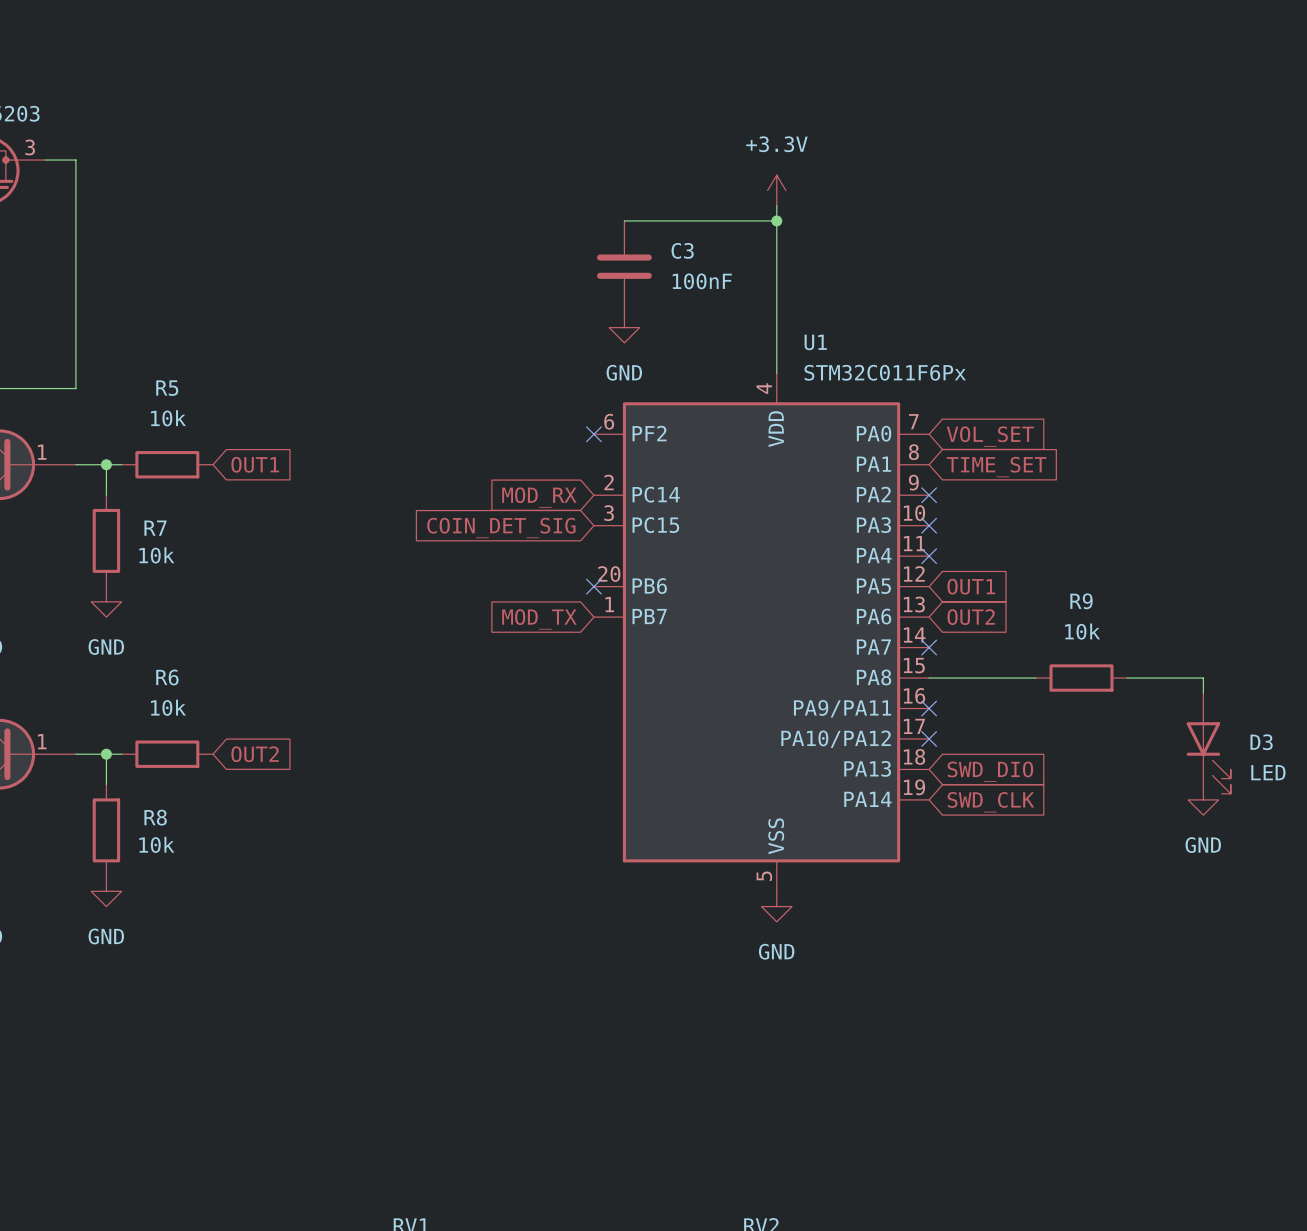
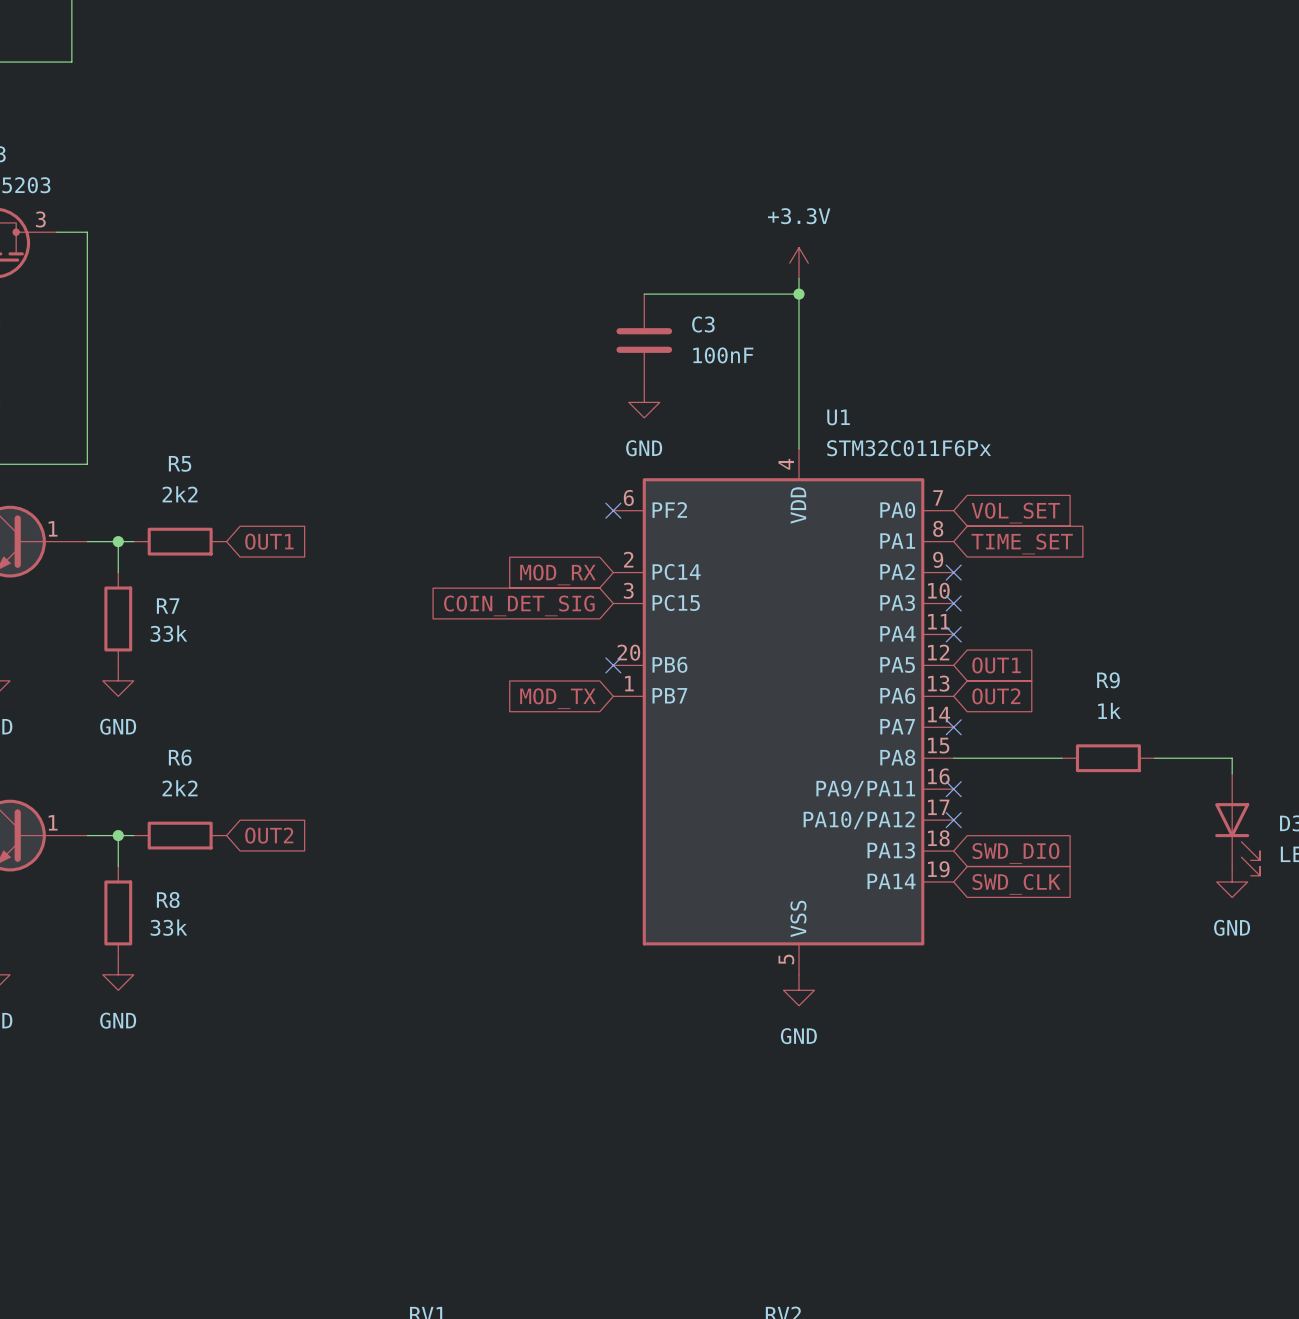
R5 value: 10k (168, 418) -> 2k2 (180, 494)
R7 value: 10k (156, 555) -> 33k (168, 633)
R9 value: 10k (1082, 631) -> 1k (1109, 710)
R6 value: 10k (168, 707) -> 2k2 (180, 788)
R8 value: 10k (156, 844) -> 33k (168, 927)

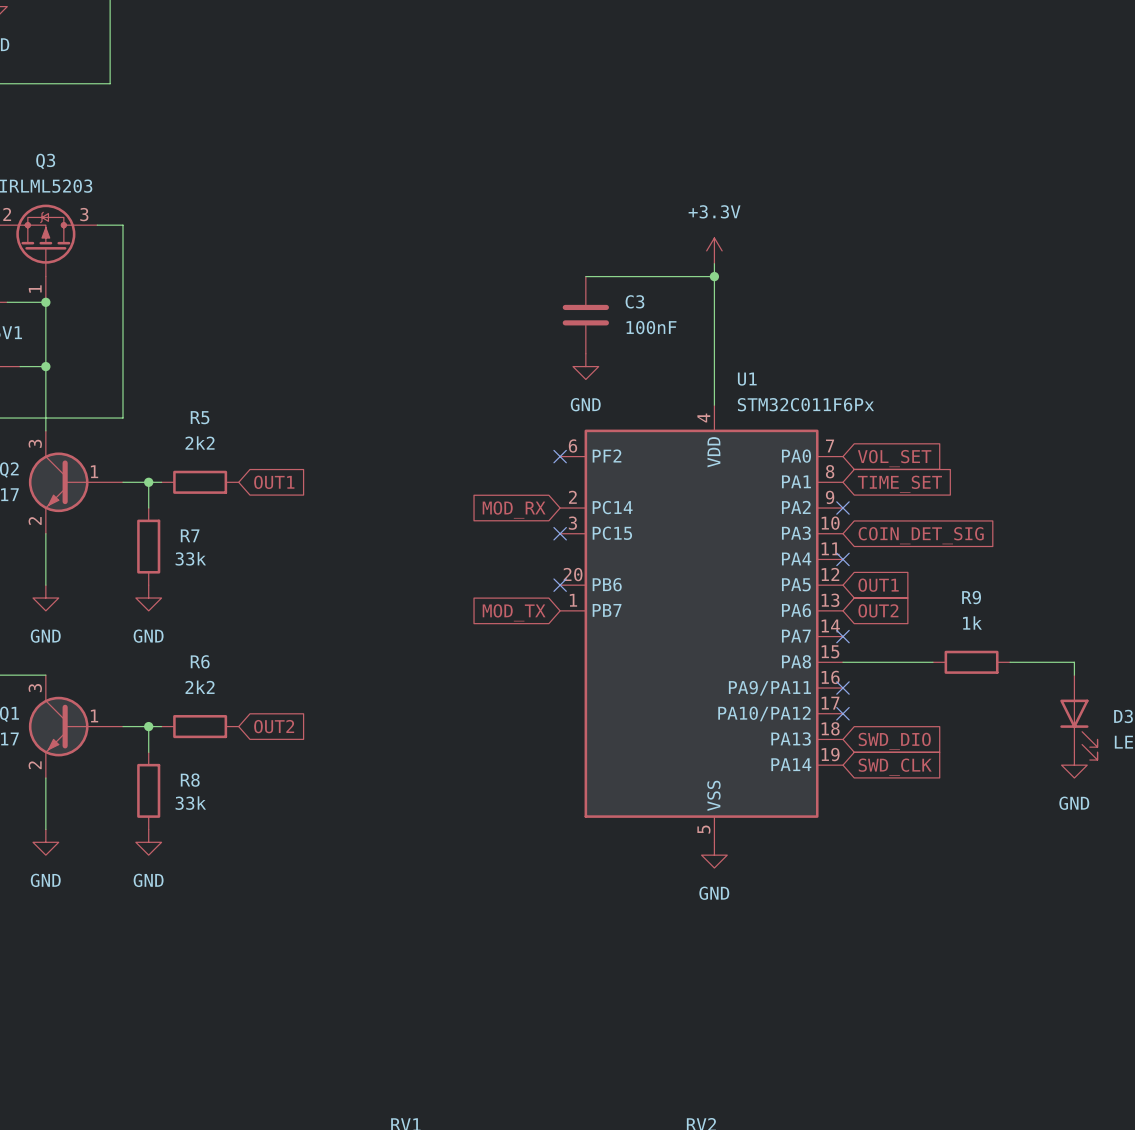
no-connect mark: none -> (560, 533)
no-connect mark: (953, 603) -> none
global label: COIN_DET_SIG (519, 605) -> none
global label: none -> COIN_DET_SIG (921, 535)

